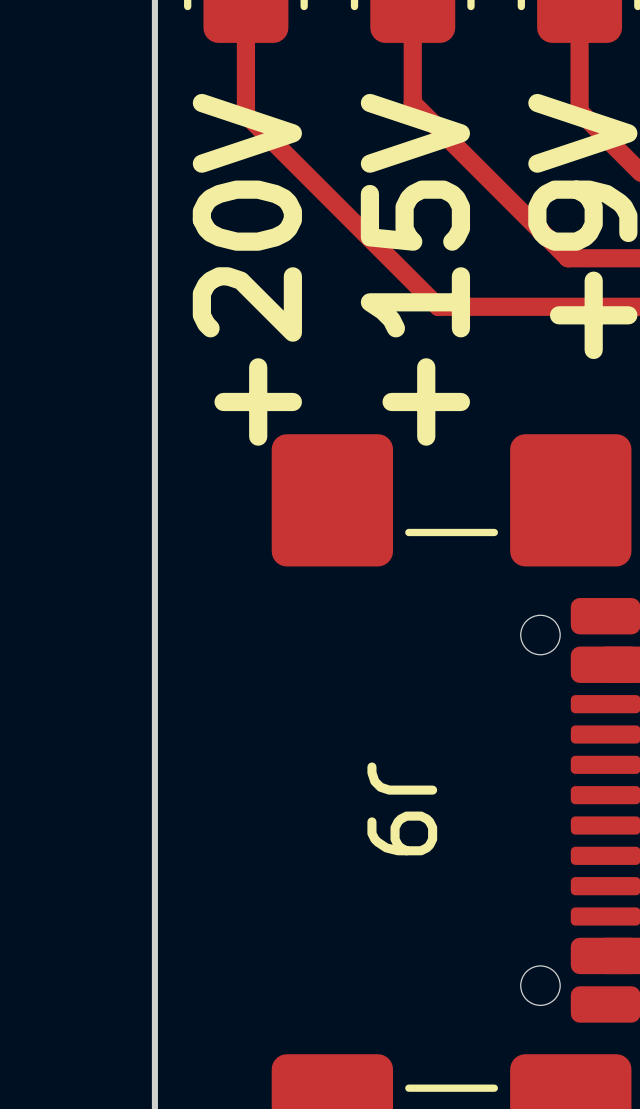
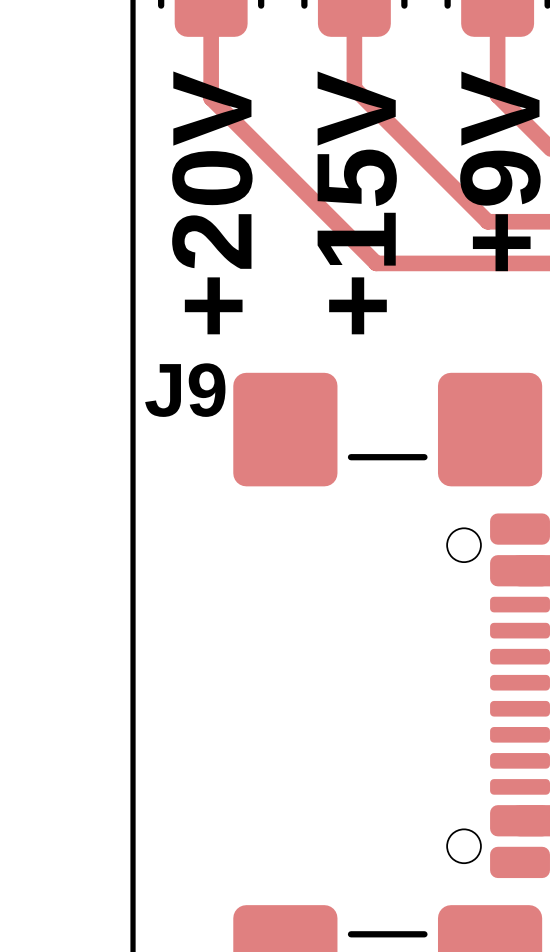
J9 name rotation: 0° (402, 808) -> 90° counterclockwise (185, 390)
J9 name position: J9 (402, 808) -> J9 (185, 390)

